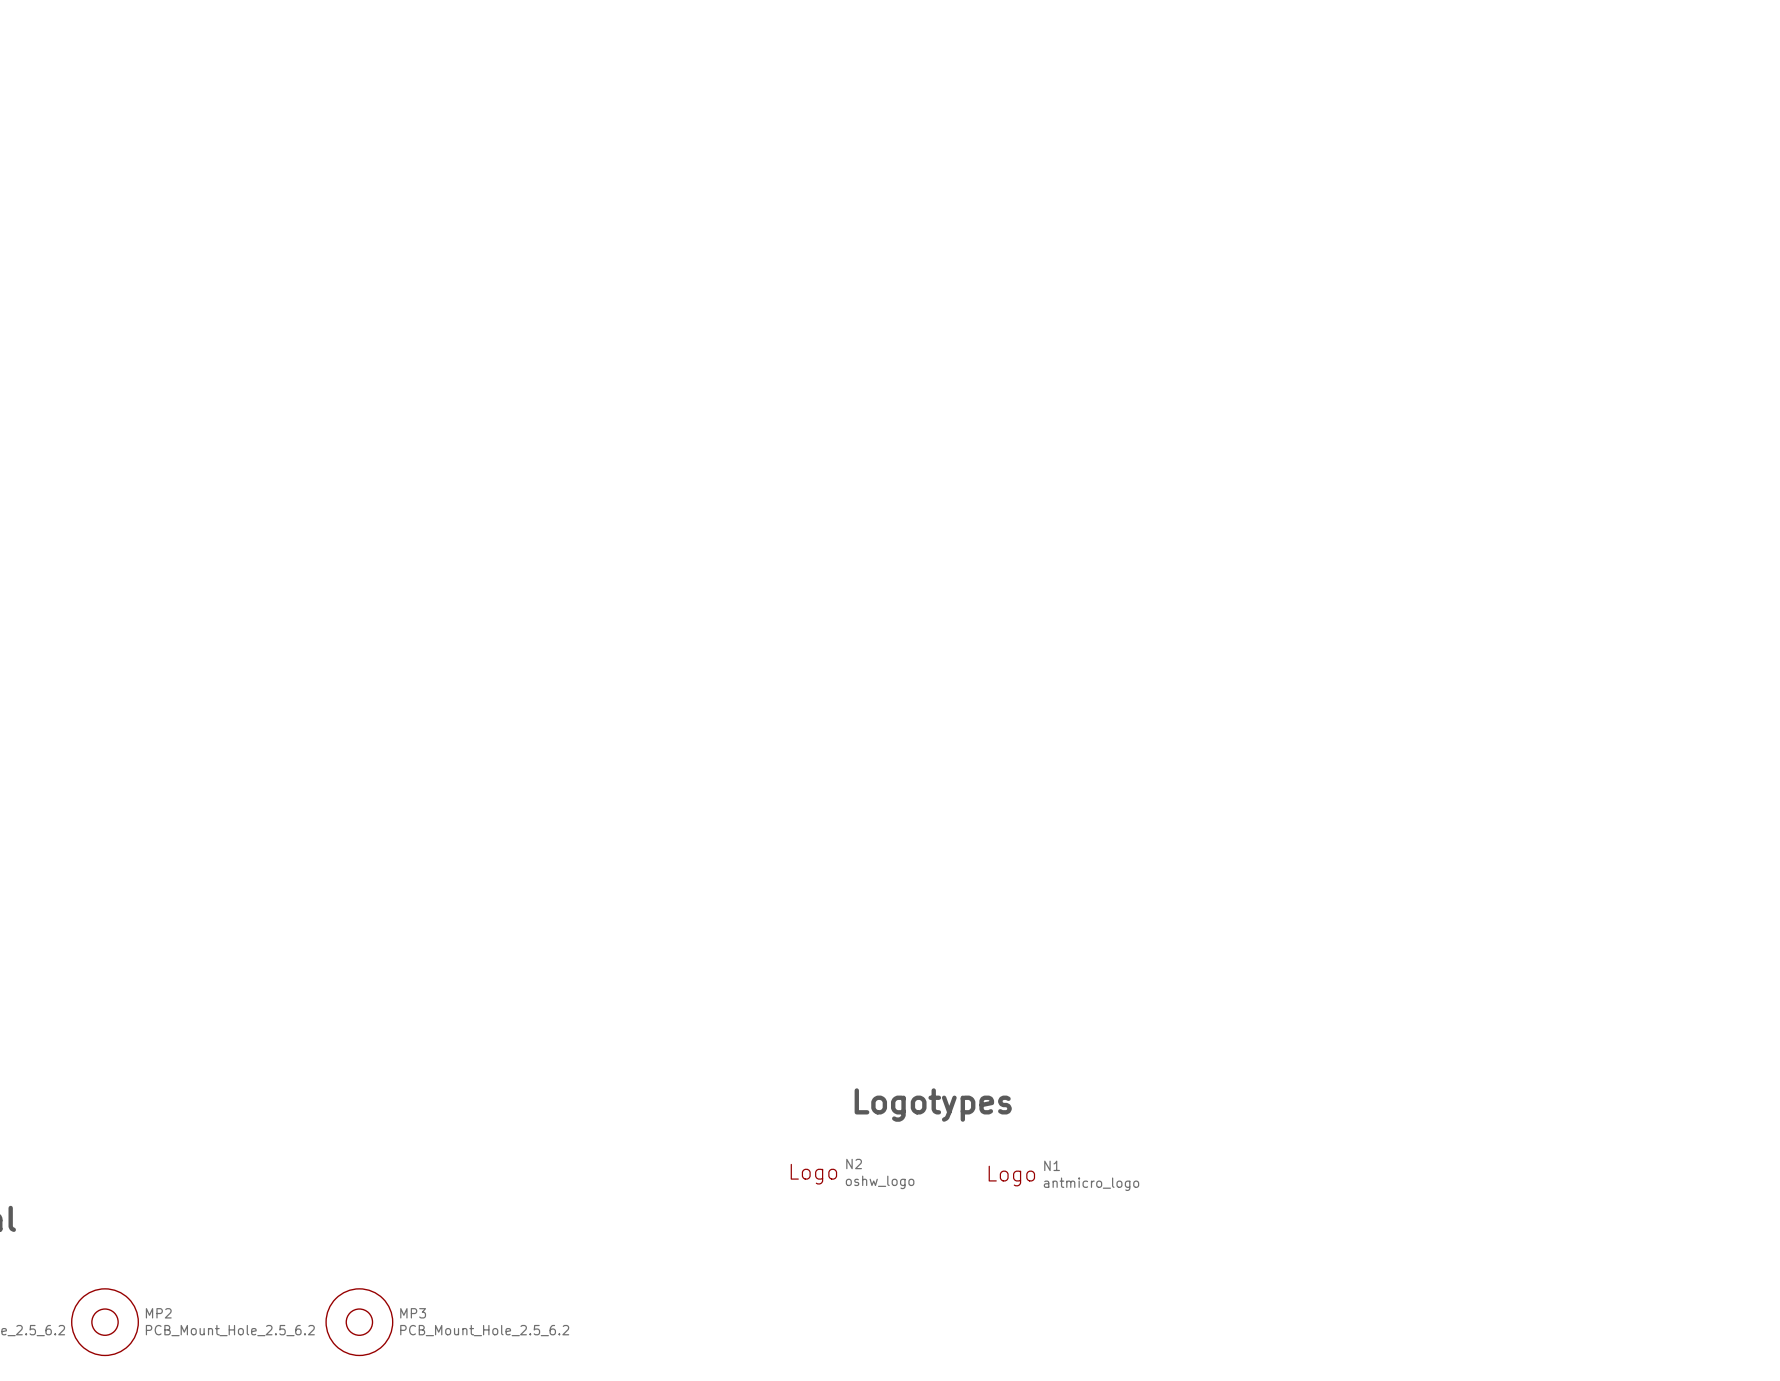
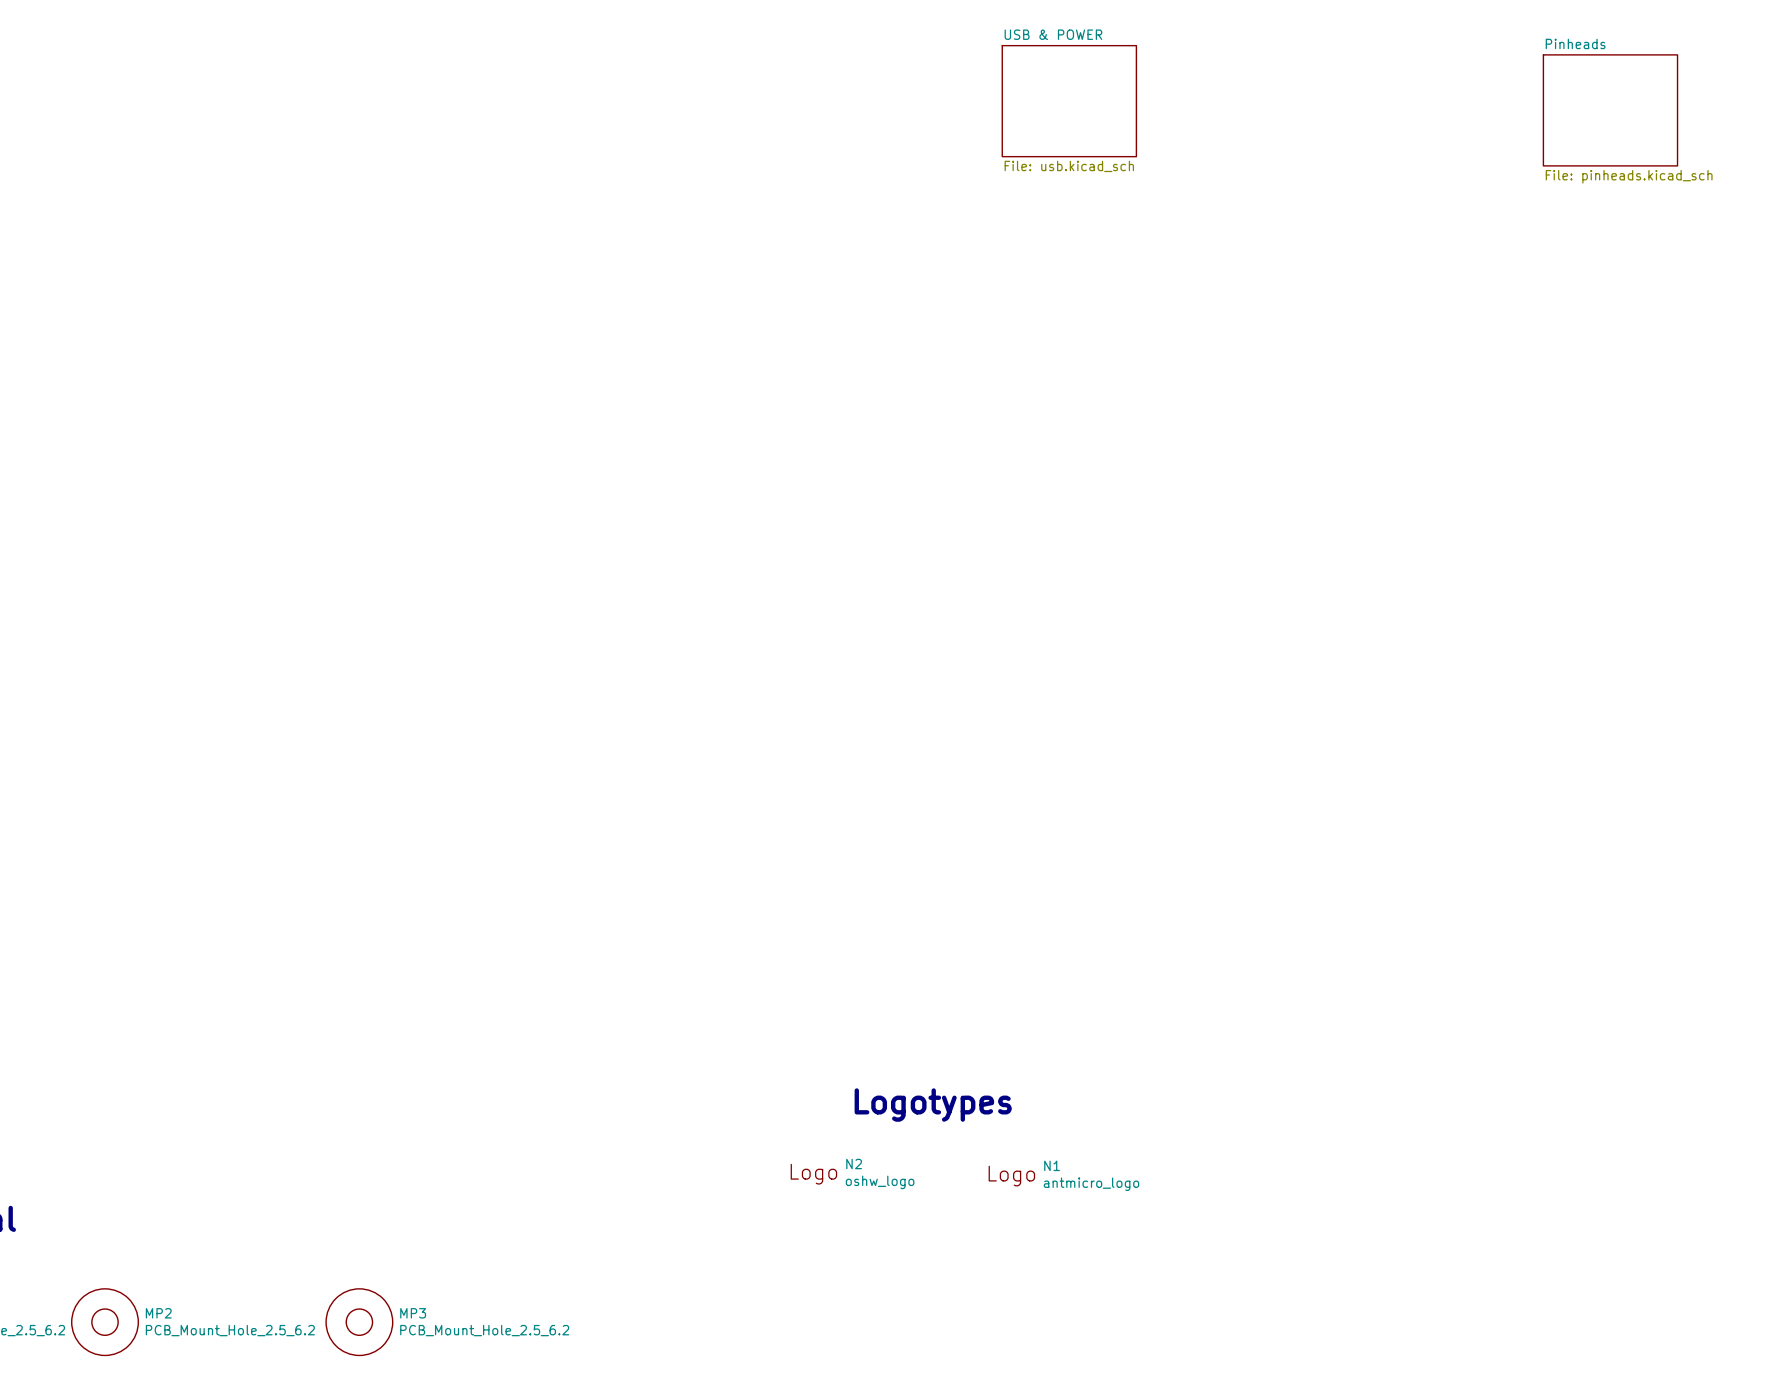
sheet USB & POWER: none -> File: usb.kicad_sch (1069, 101)
sheet Pinheads: none -> File: pinheads.kicad_sch (1610, 110)

